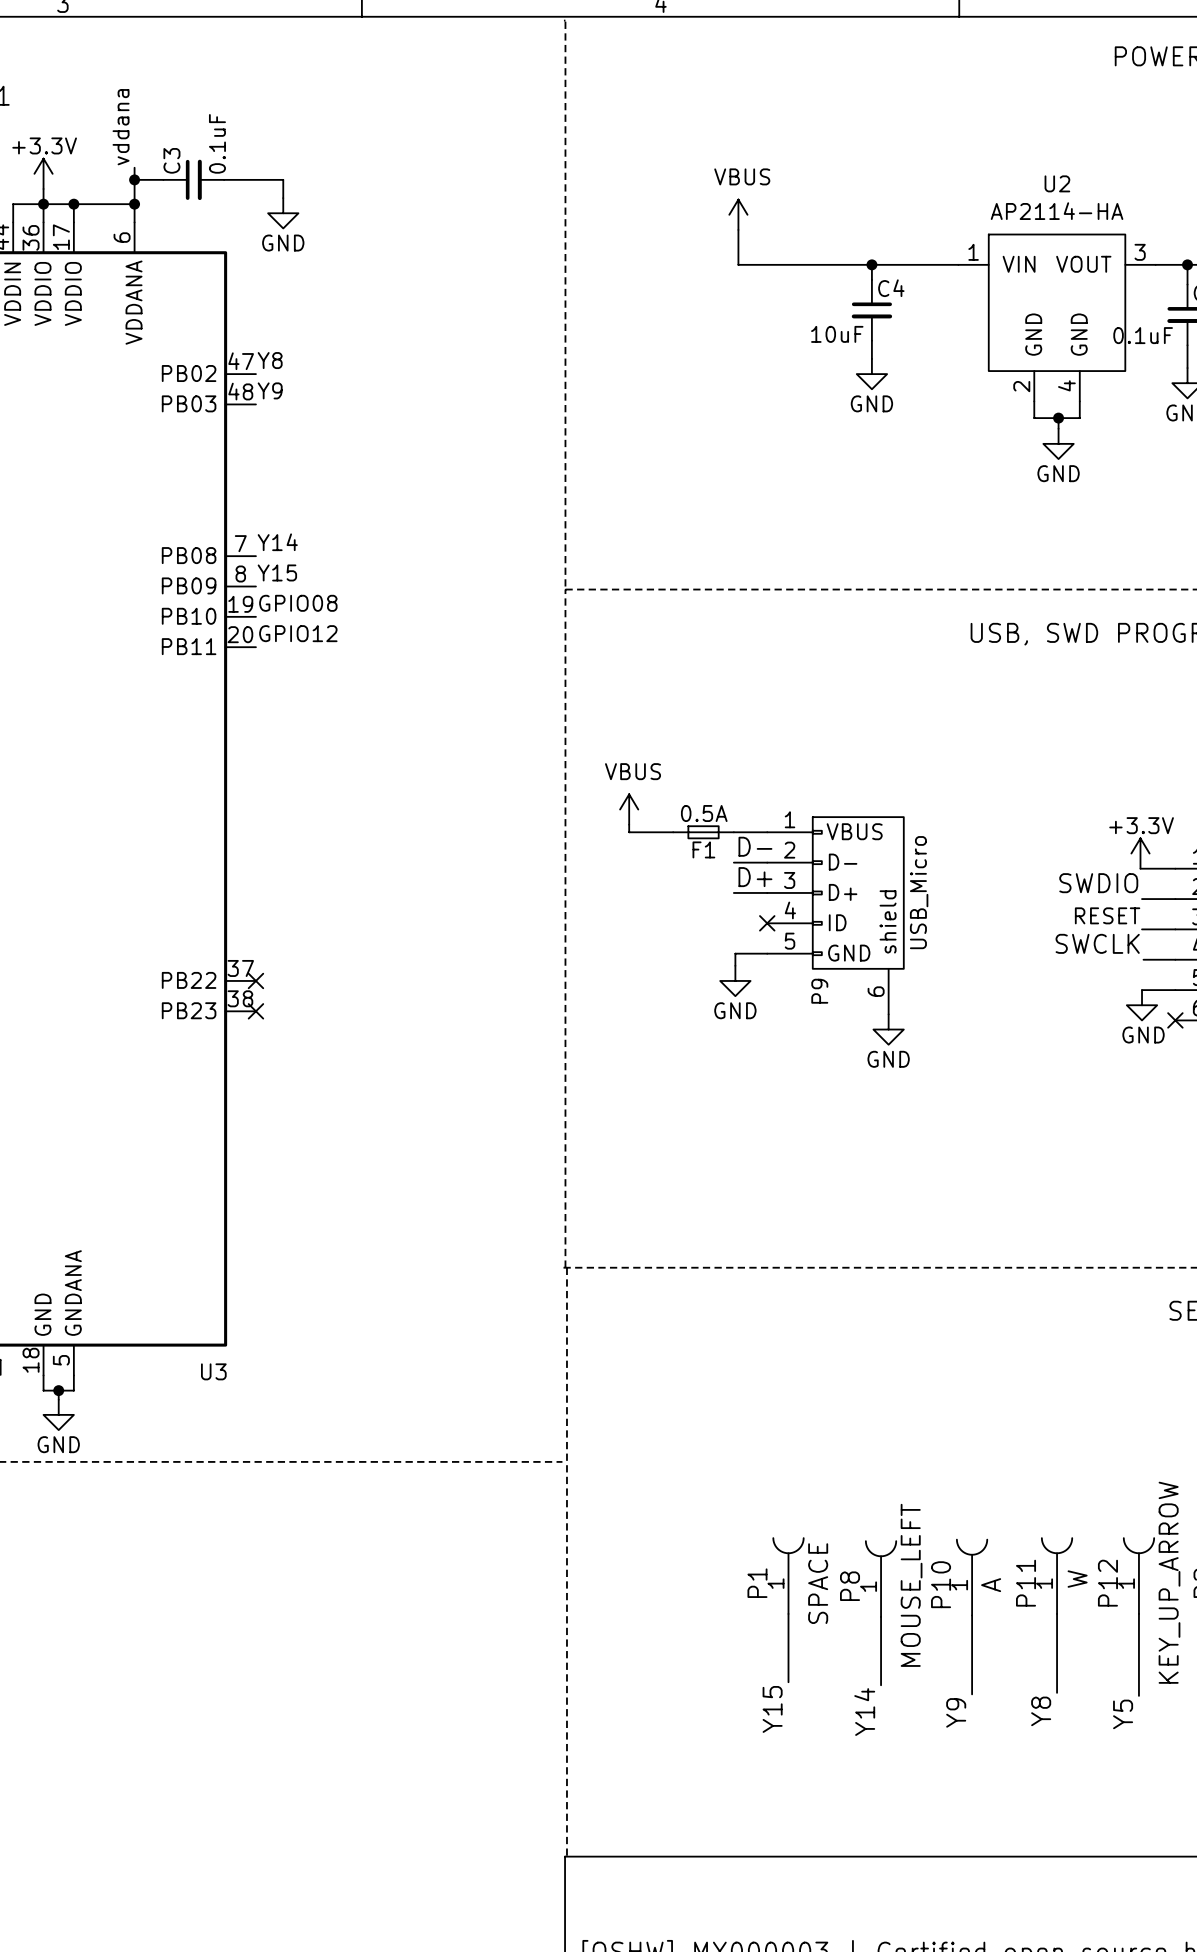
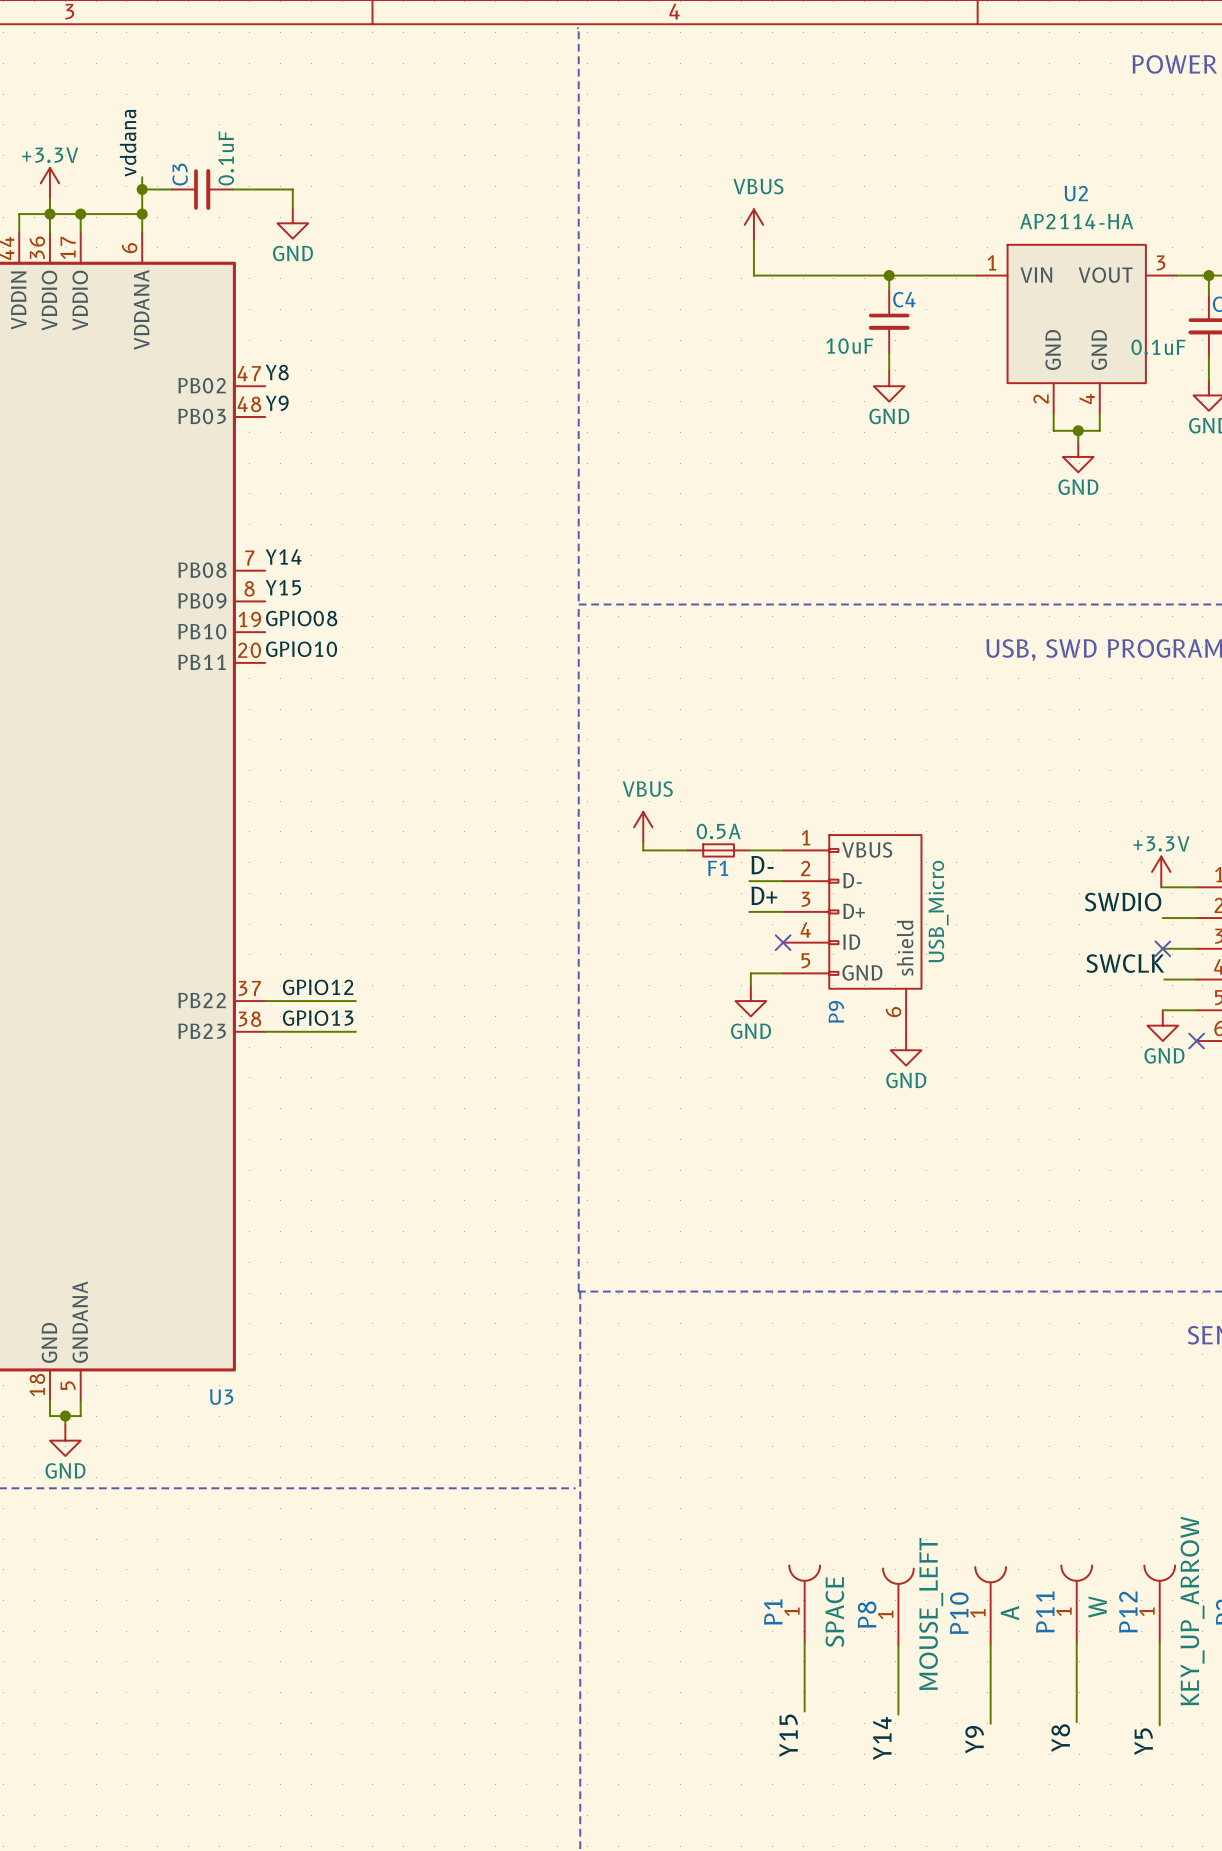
label: GPIO12 (298, 633) -> GPIO10 (301, 649)
label: RESET (1107, 915) -> none
no-connect mark: none -> (1162, 948)
label: none -> GPIO12 (318, 987)
wire: none -> (265, 1001) (355, 1001)
no-connect mark: (255, 980) -> none
label: none -> GPIO13 (318, 1018)
wire: none -> (265, 1031) (355, 1031)
no-connect mark: (255, 1011) -> none

